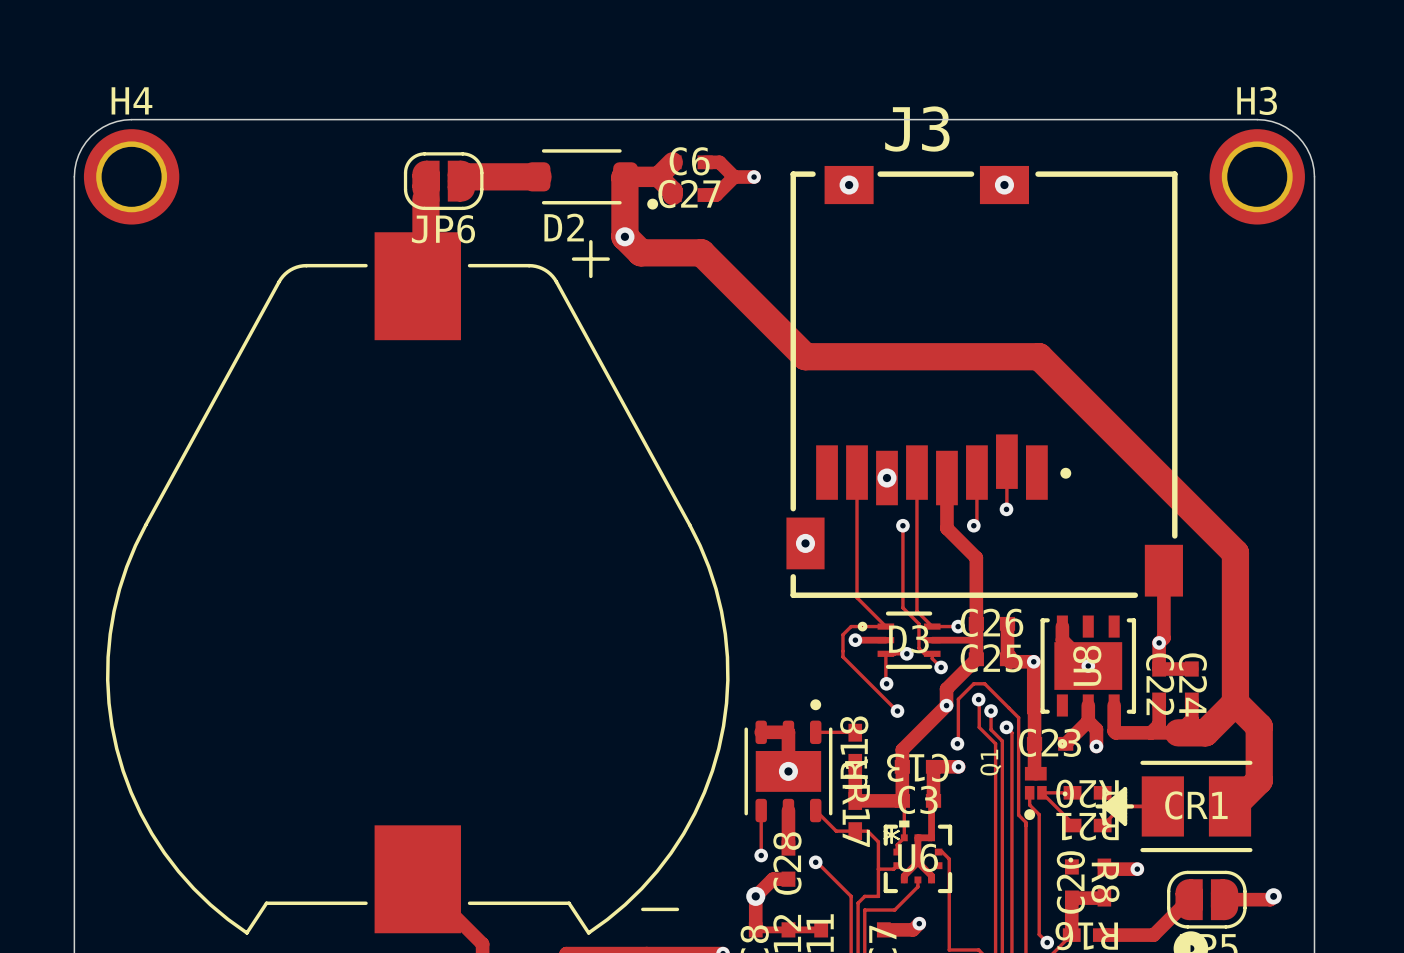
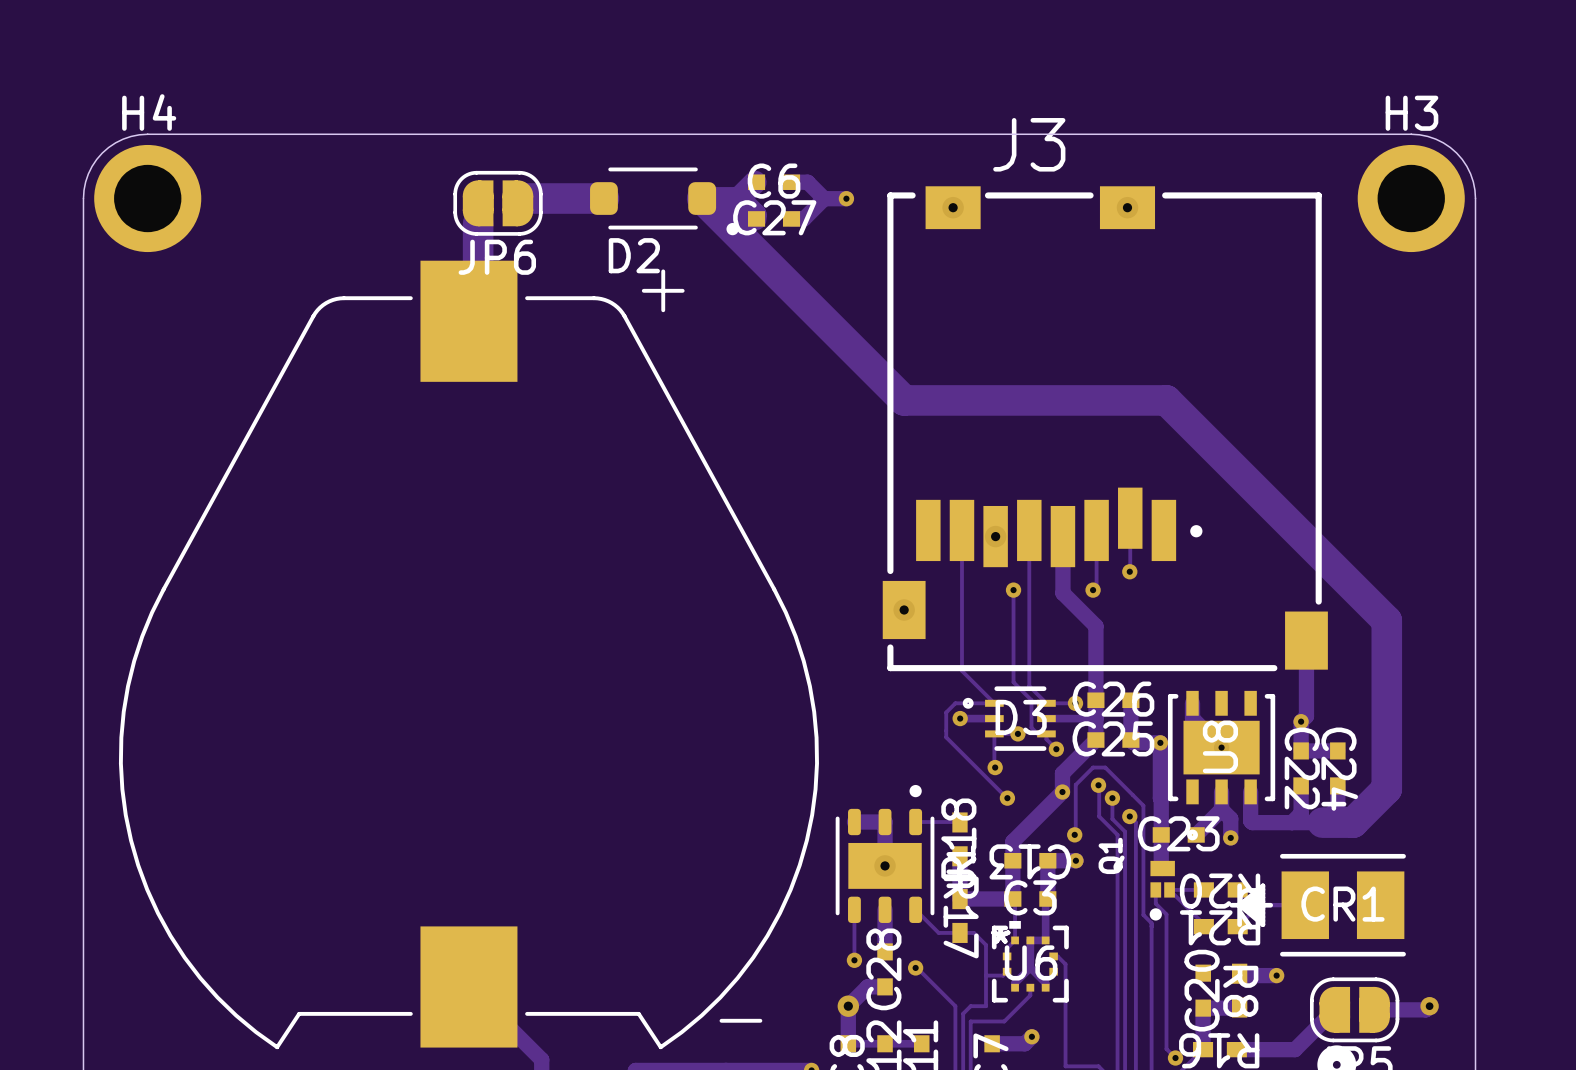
track: (625, 176) (624, 236) (640, 252) (701, 252) -> (702, 198) (787, 283)
via: (624, 236) -> none
track: (1235, 702) (1259, 726) (1259, 780) (1233, 806) (1230, 806) -> none

